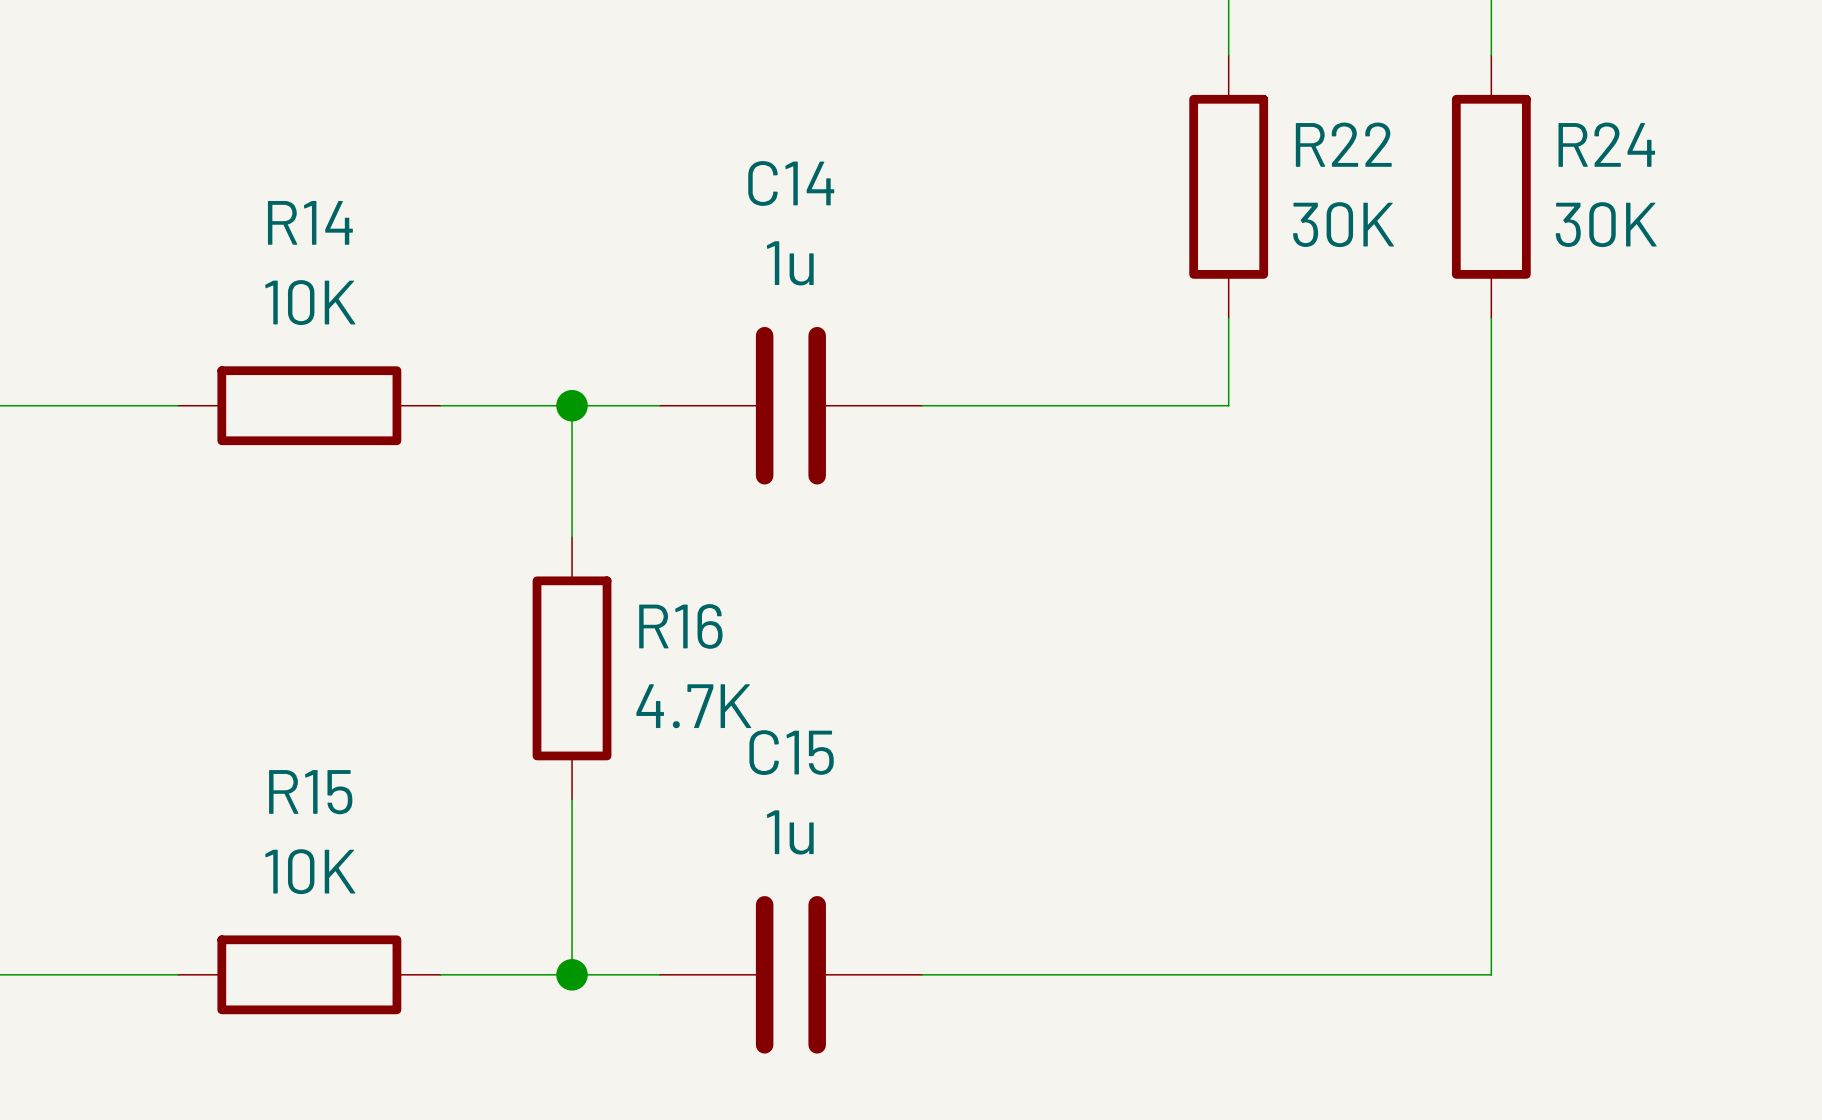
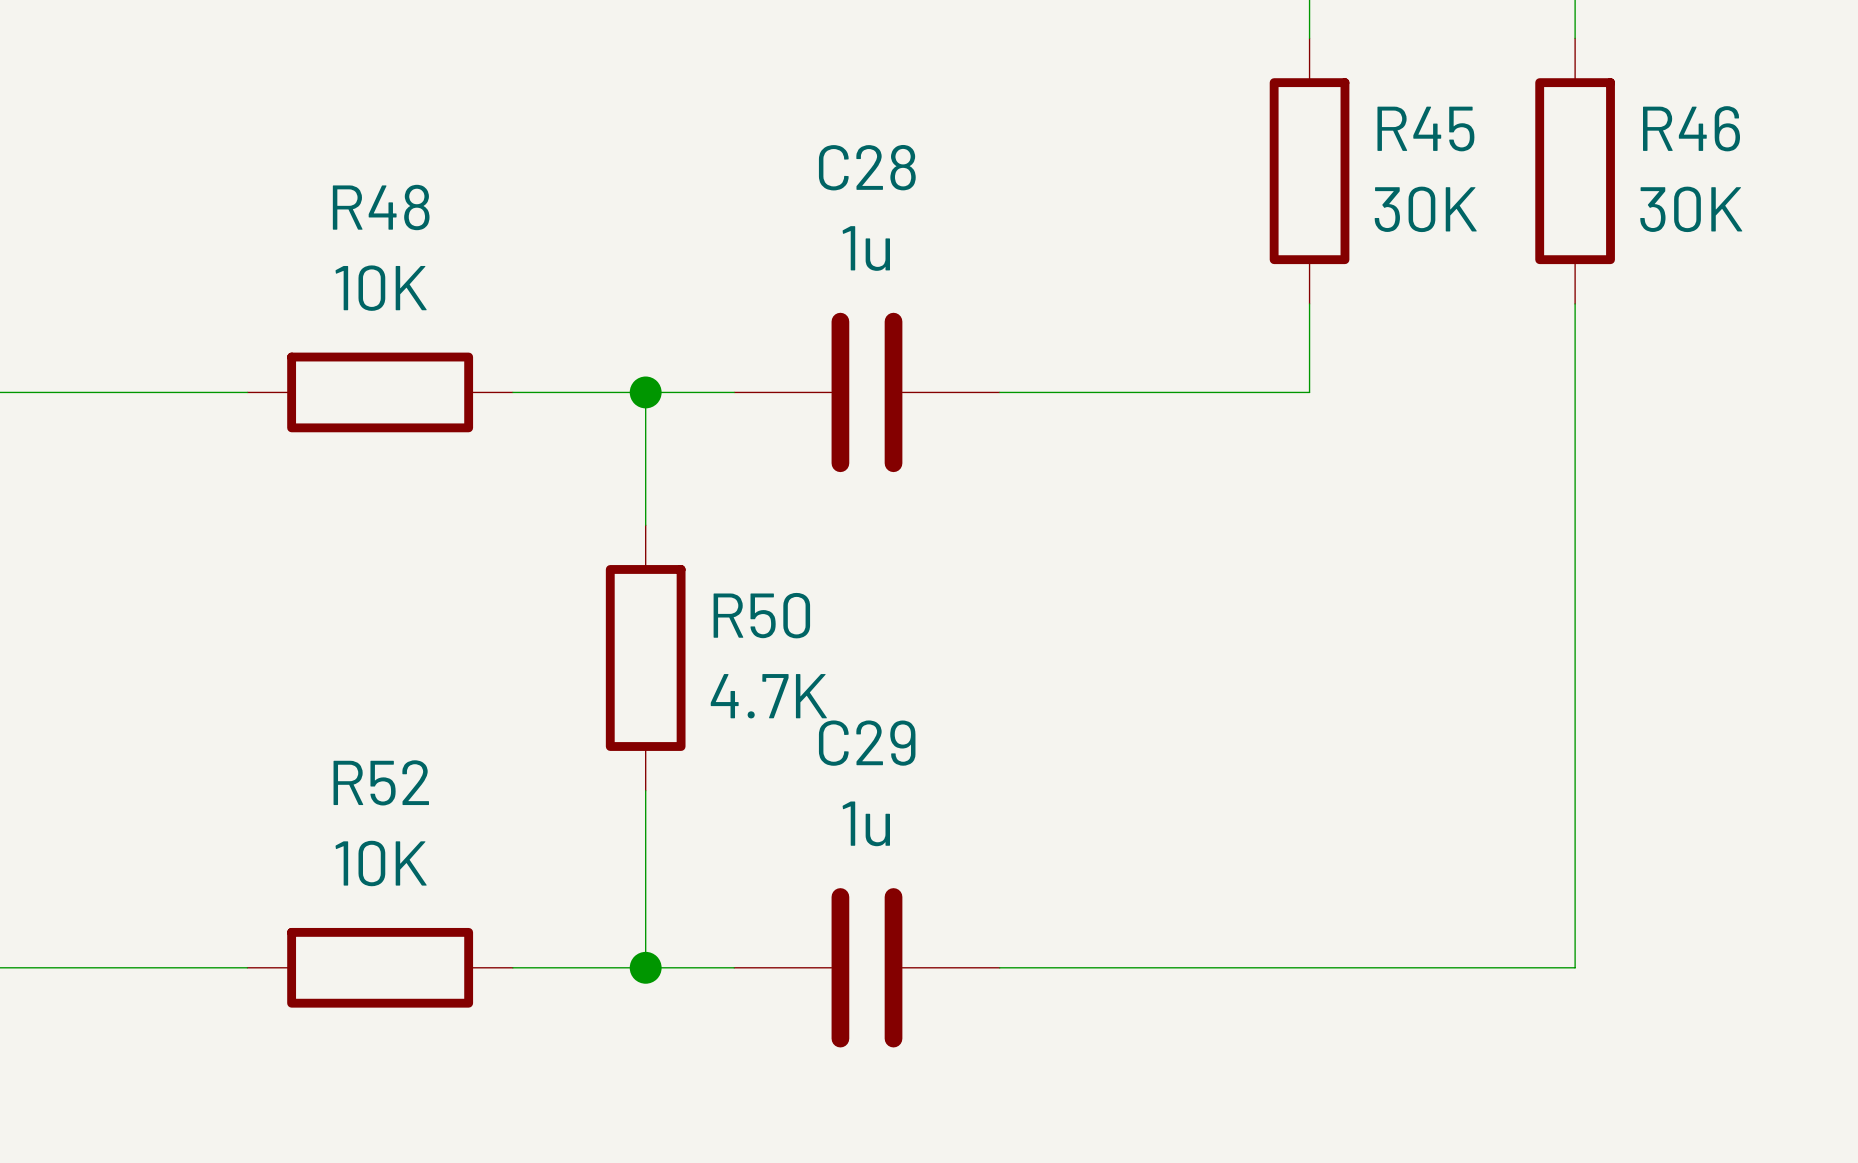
R22 name: R22 (1343, 144) -> R45 (1425, 129)
R24 name: R24 (1606, 144) -> R46 (1691, 128)
C14 name: C14 (791, 183) -> C28 (867, 167)
R14 name: R14 (310, 222) -> R48 (381, 207)
R16 name: R16 (680, 626) -> R50 (761, 615)
C15 name: C15 (791, 752) -> C29 (867, 743)
R15 name: R15 (310, 792) -> R52 (381, 782)

